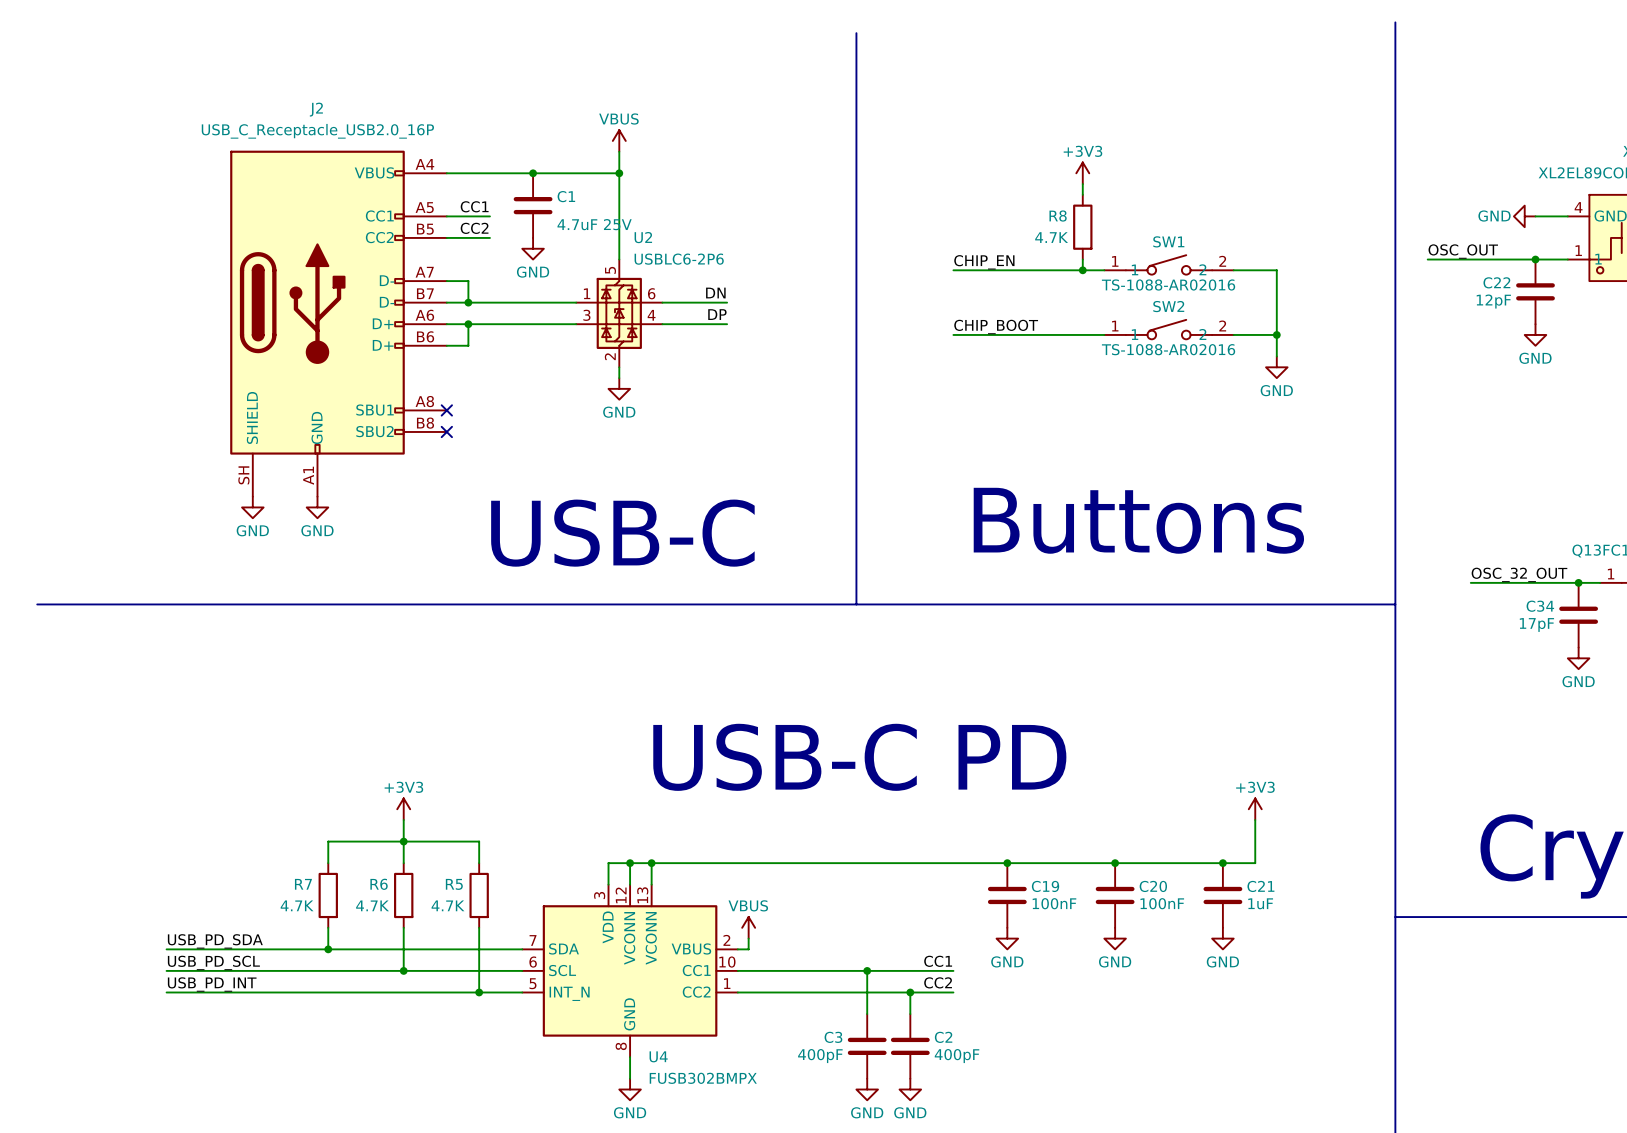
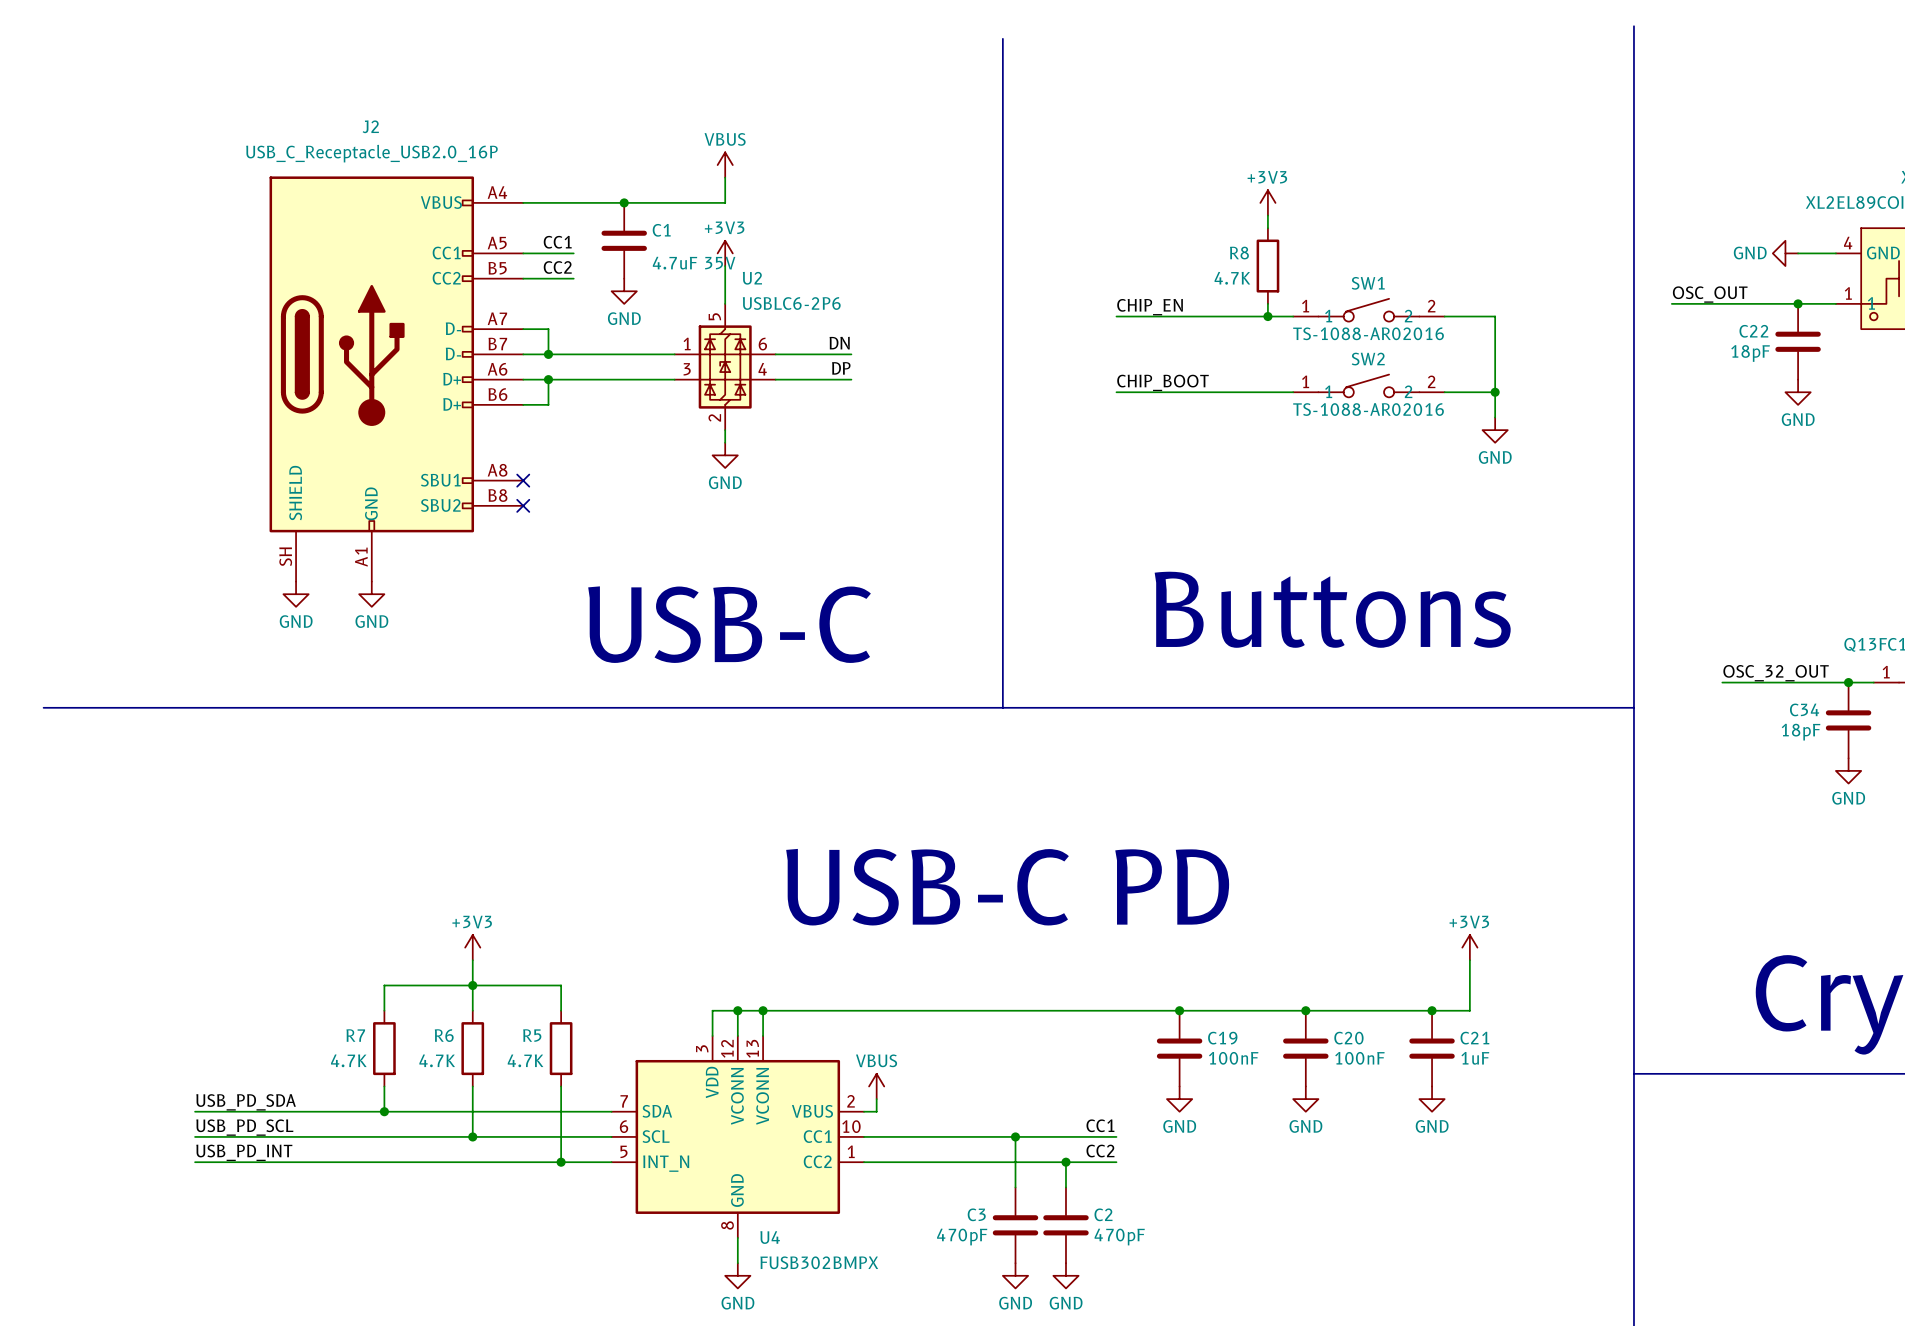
wire: (619, 173) (619, 227) -> none
junction: (619, 173) -> none
power symbol: none -> +3V3 (725, 253)
C1 value: 4.7uF 25V (594, 224) -> 4.7uF 35V (694, 263)
C22 value: 12pF (1493, 301) -> 18pF (1750, 353)
C34 value: 17pF (1536, 624) -> 18pF (1801, 732)
C3 value: 400pF (820, 1056) -> 470pF (962, 1237)
C2 value: 400pF (957, 1056) -> 470pF (1119, 1237)

